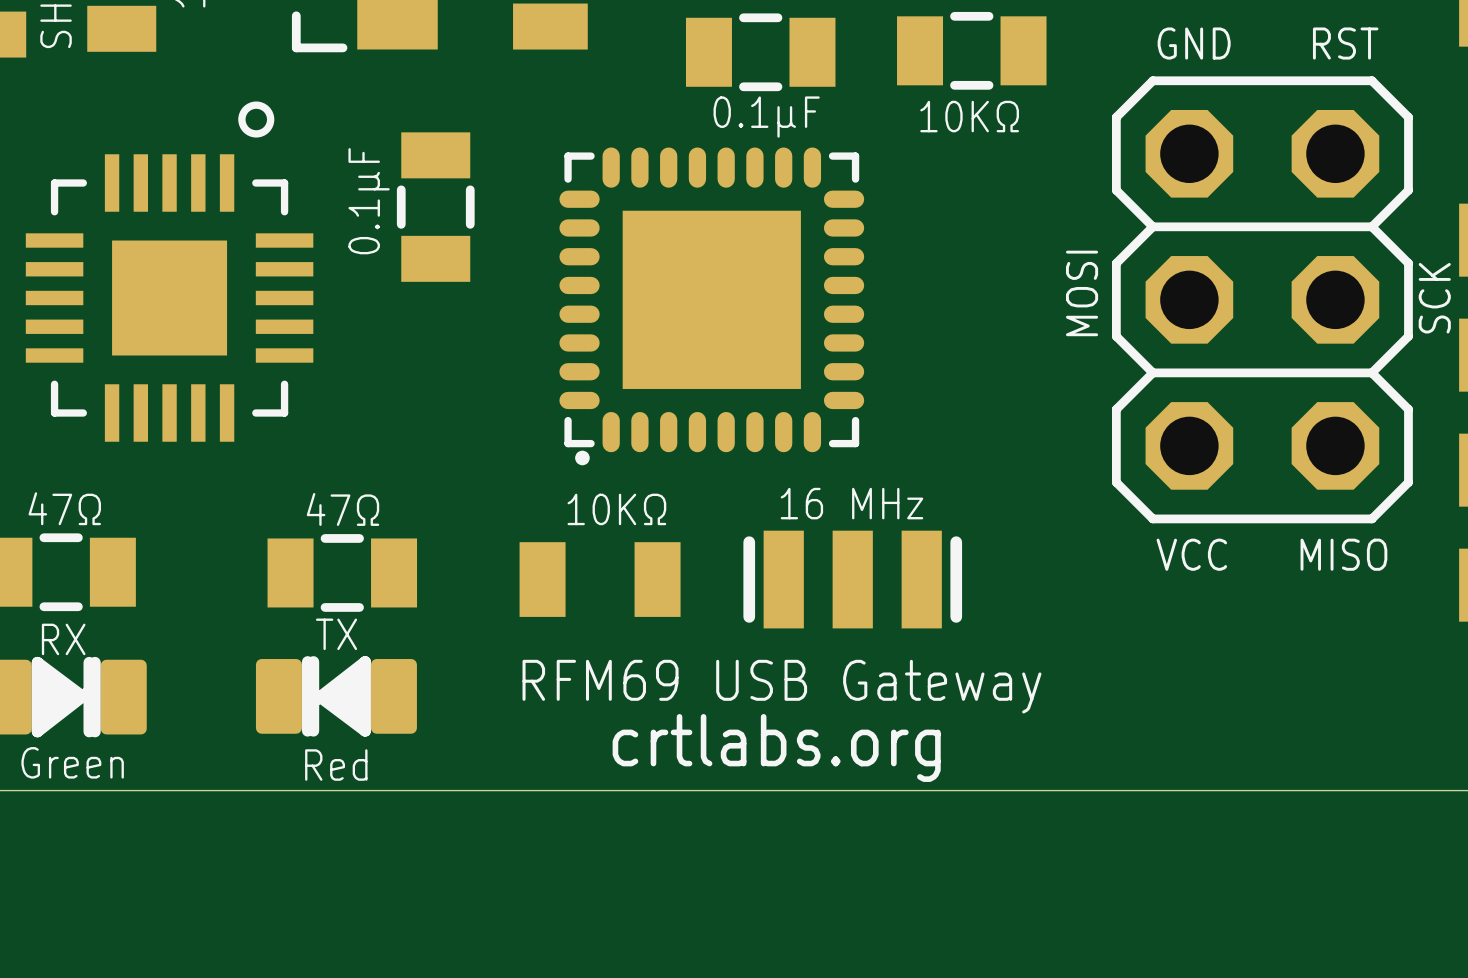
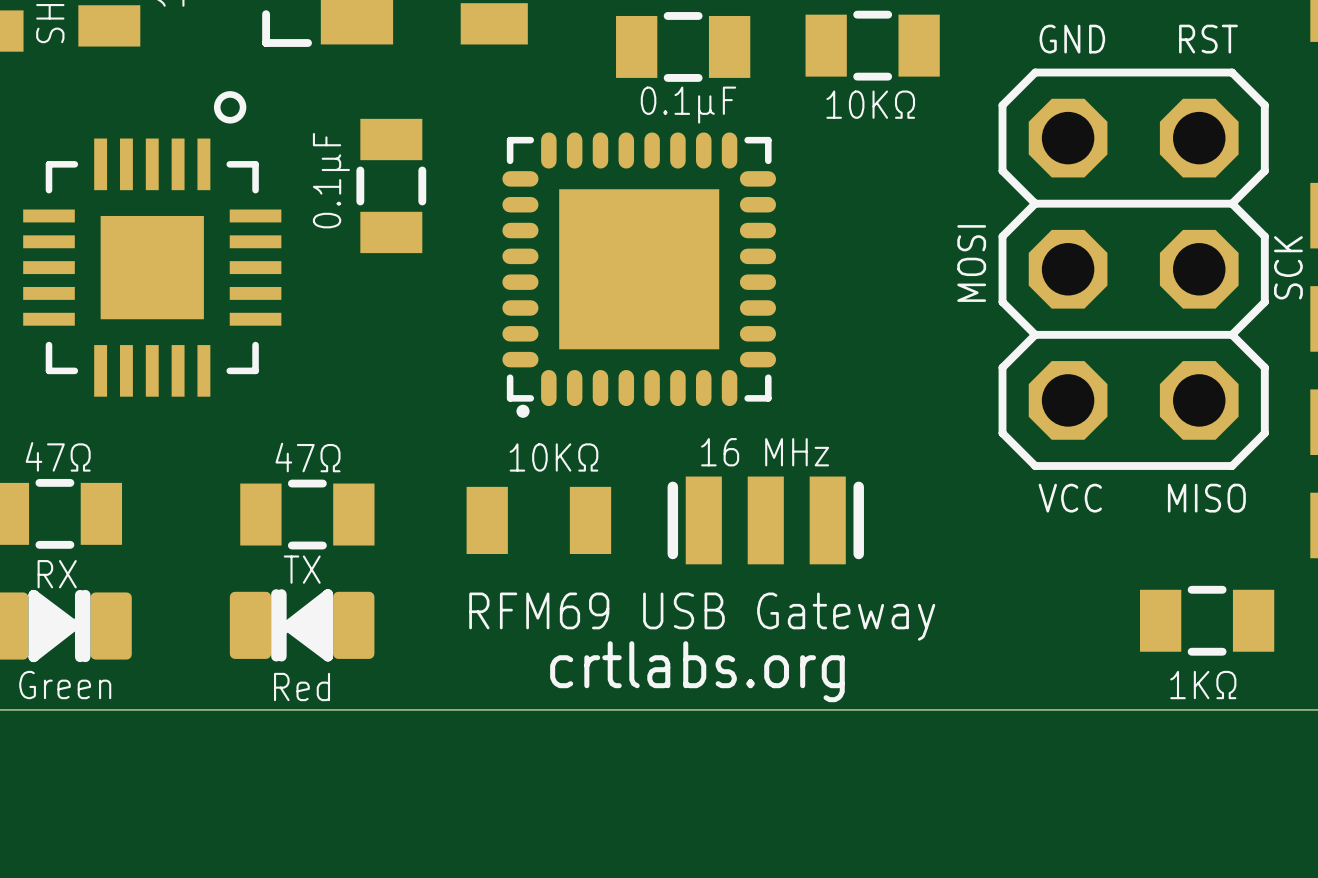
part: none -> 1KΩ (1207, 620)

